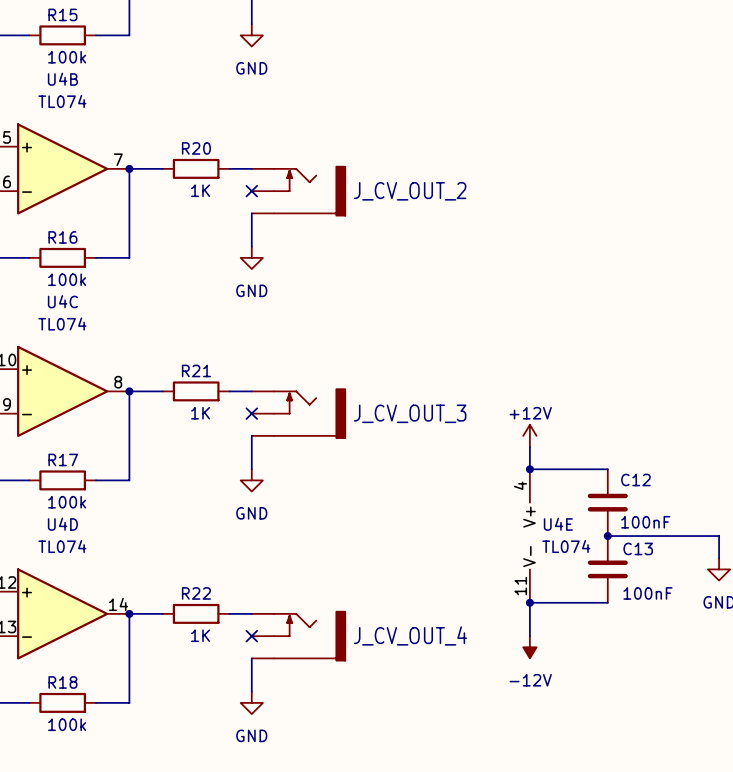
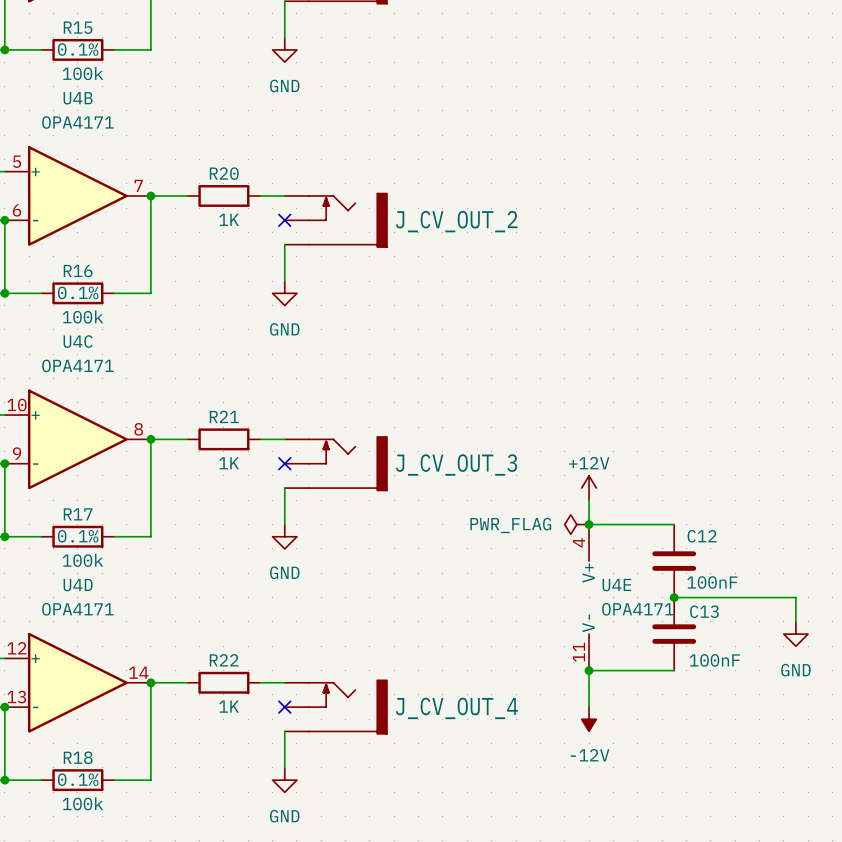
R15 text: none -> 0.1% (78, 49)
U4B value: TL074 (62, 101) -> OPA4171 (77, 122)
R16 text: none -> 0.1% (78, 292)
U4C value: TL074 (62, 323) -> OPA4171 (77, 365)
power symbol: none -> PWR_FLAG (576, 524)
R17 text: none -> 0.1% (78, 536)
U4D value: TL074 (62, 546) -> OPA4171 (77, 609)
U4E value: TL074 (566, 546) -> OPA4171 (637, 609)
R18 text: none -> 0.1% (78, 779)

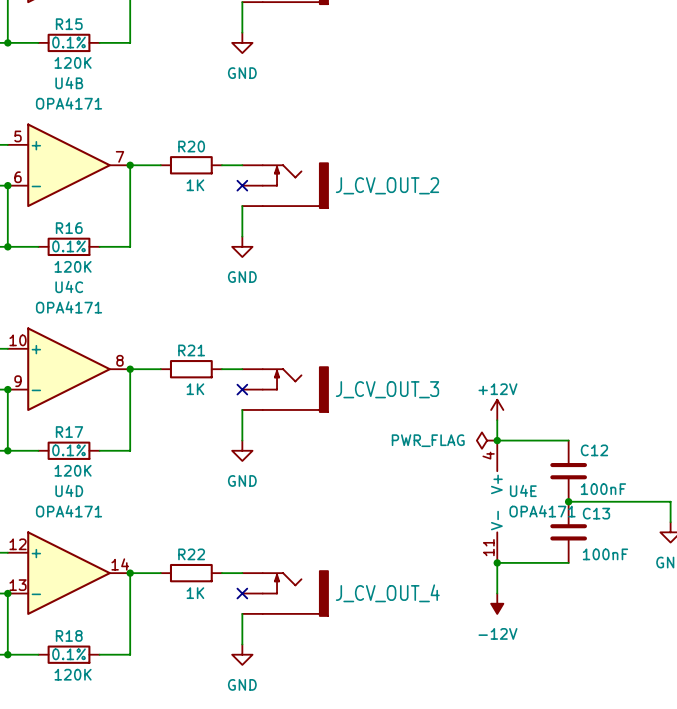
R15 value: 100k (82, 73) -> 120K (73, 62)
R16 value: 100k (82, 316) -> 120K (73, 266)
R17 value: 100k (82, 560) -> 120K (73, 470)
R18 value: 100k (82, 803) -> 120K (73, 674)

